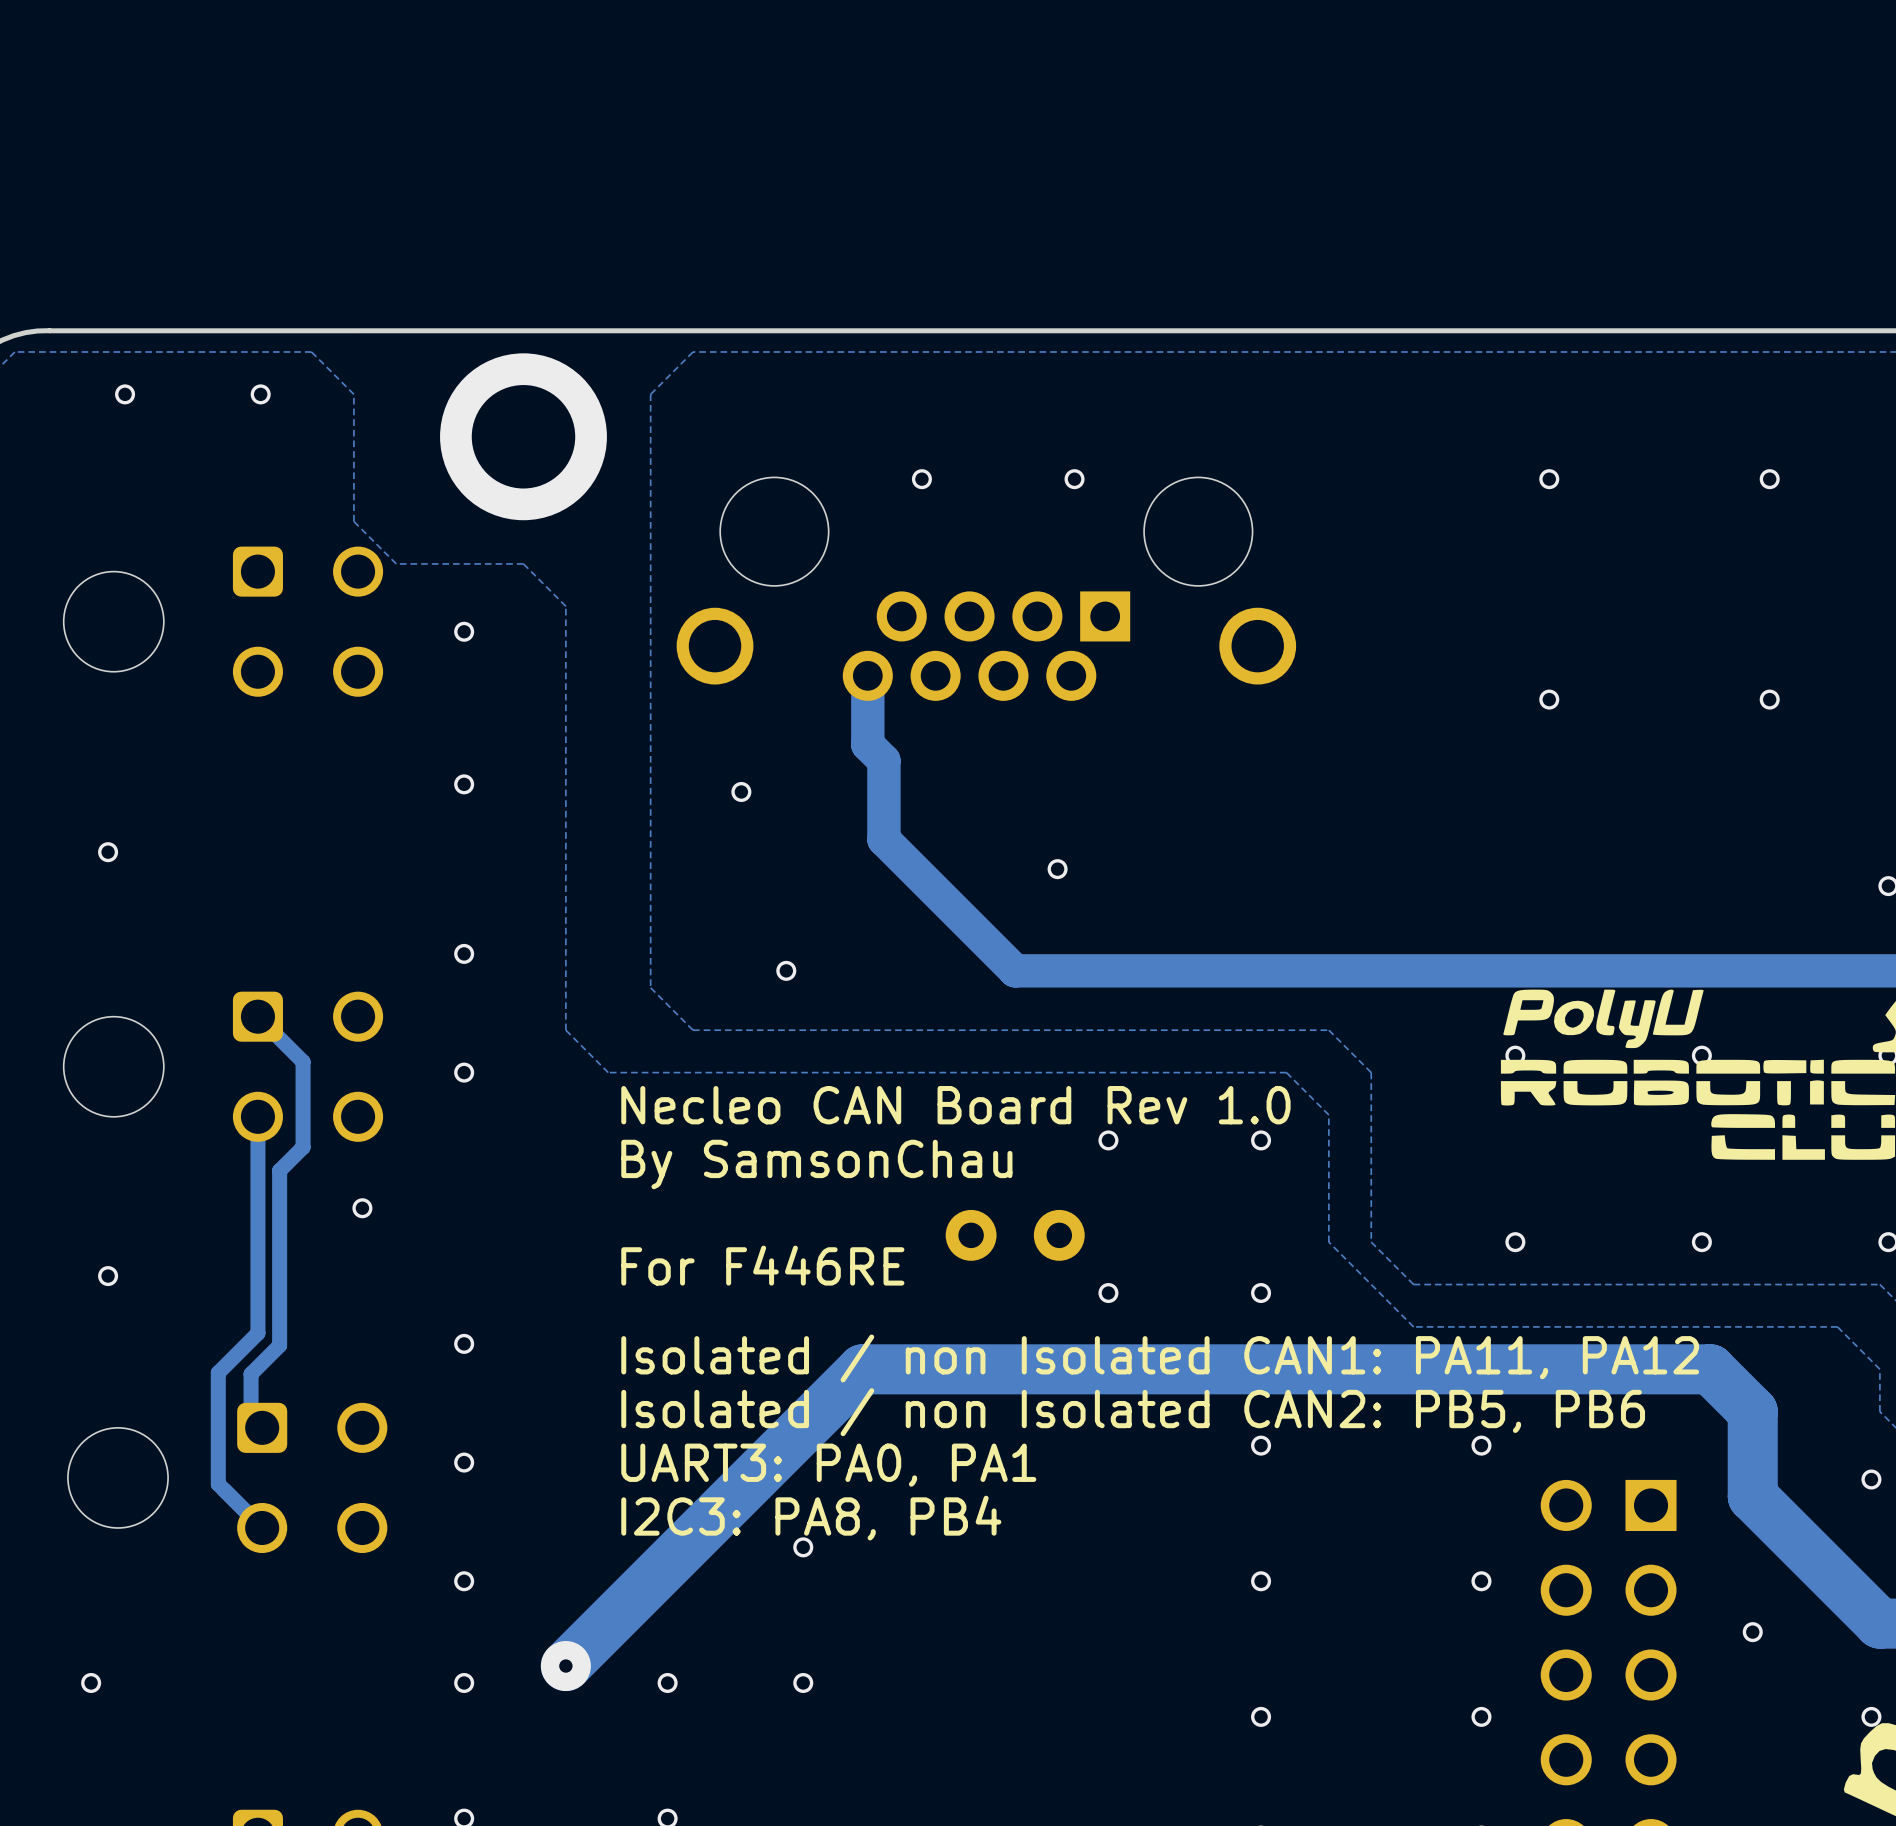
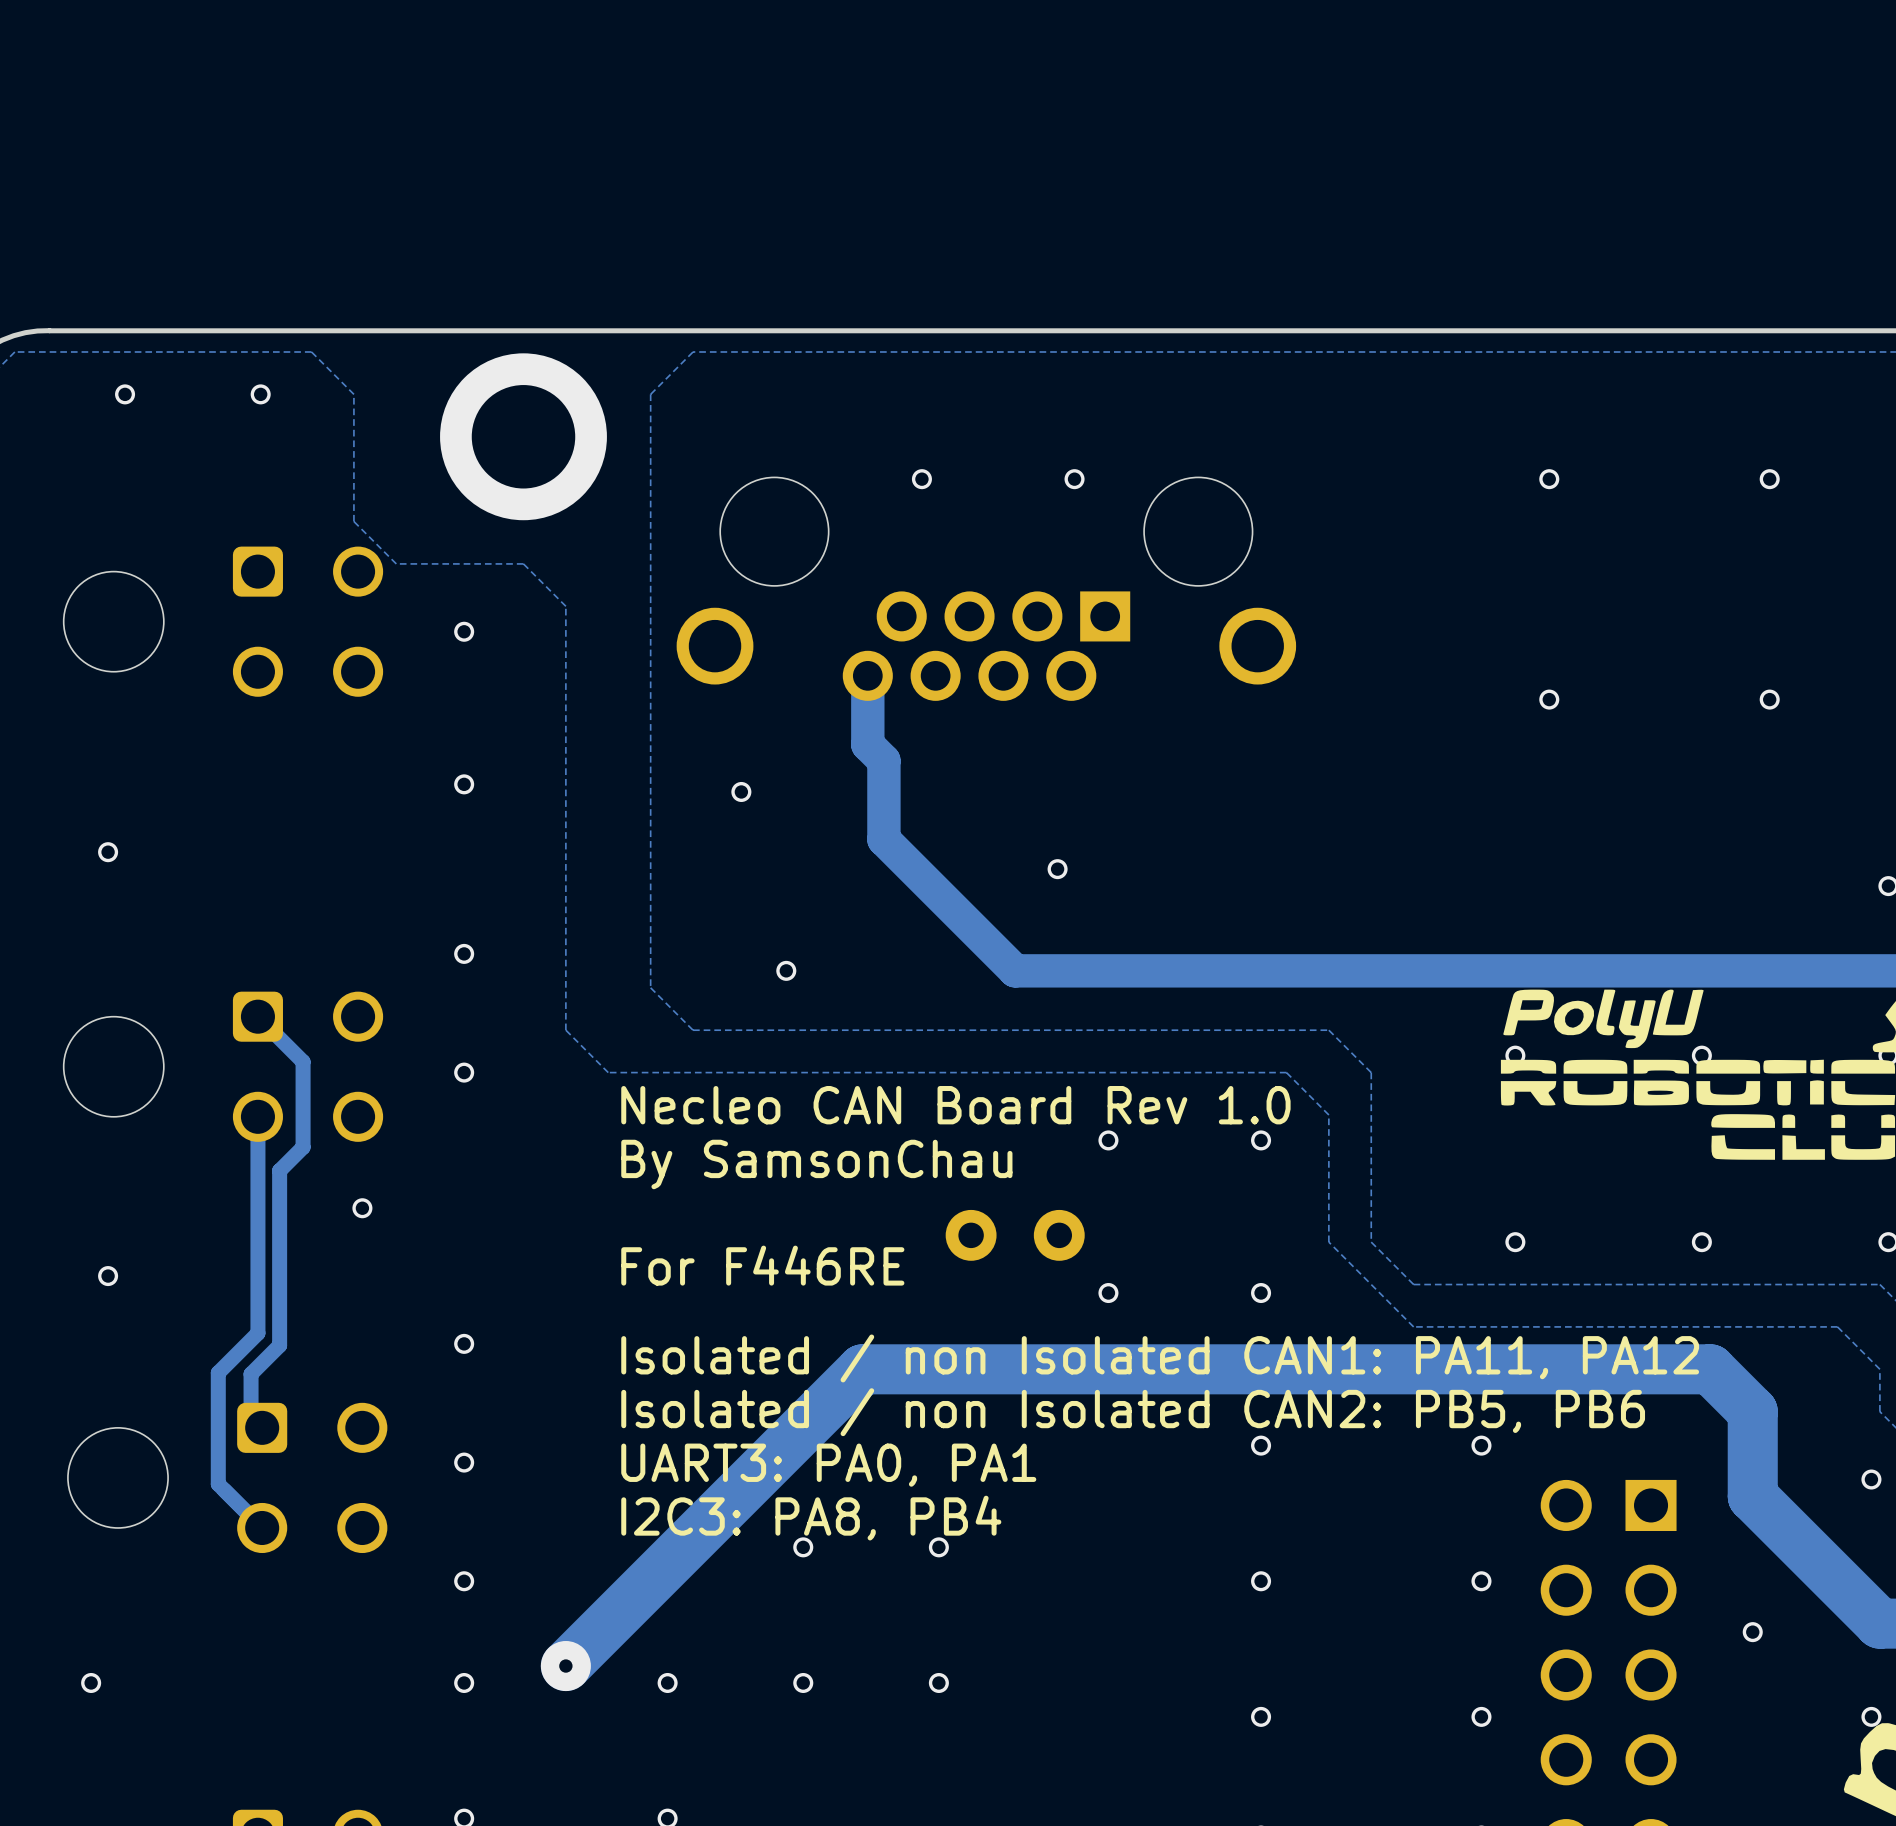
via: none -> (938, 1547)
via: none -> (938, 1682)

